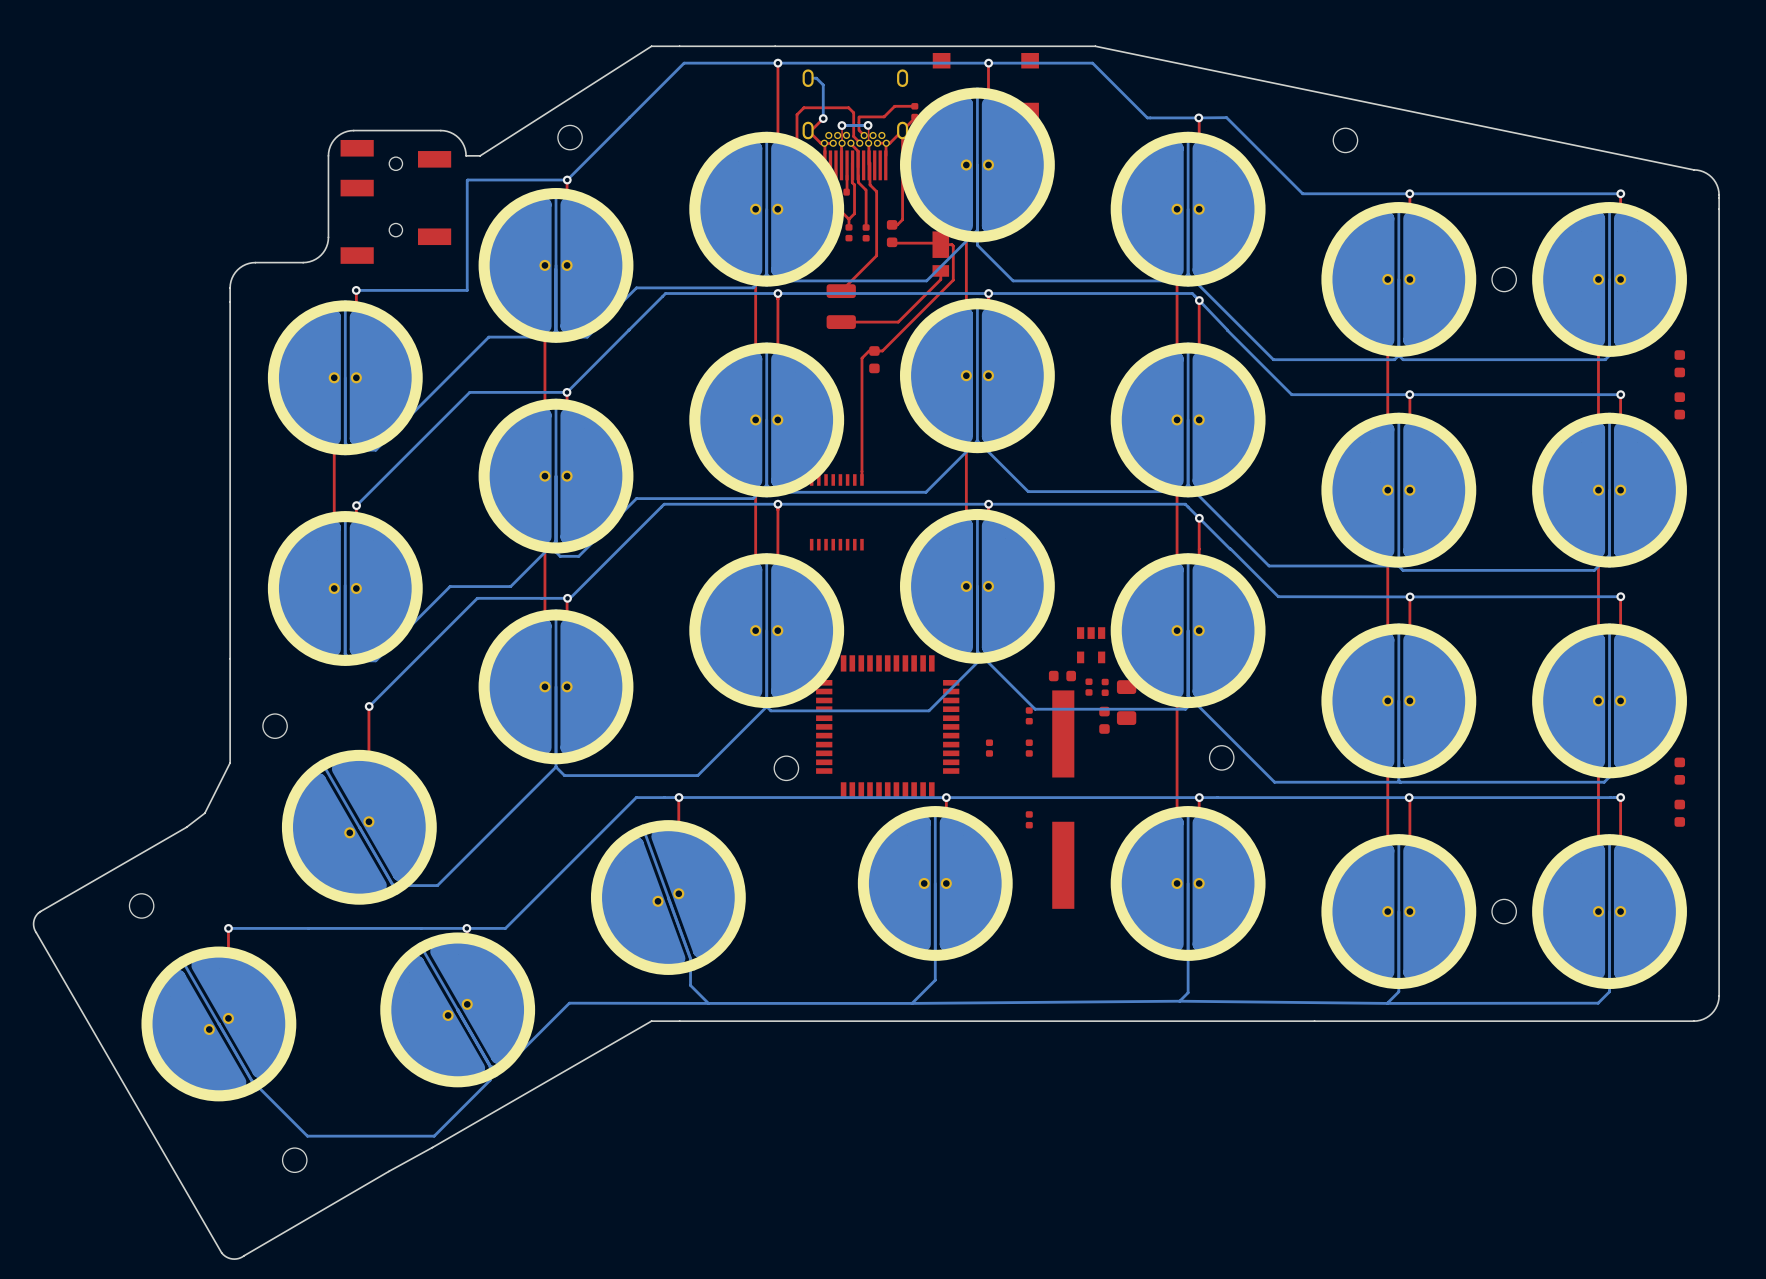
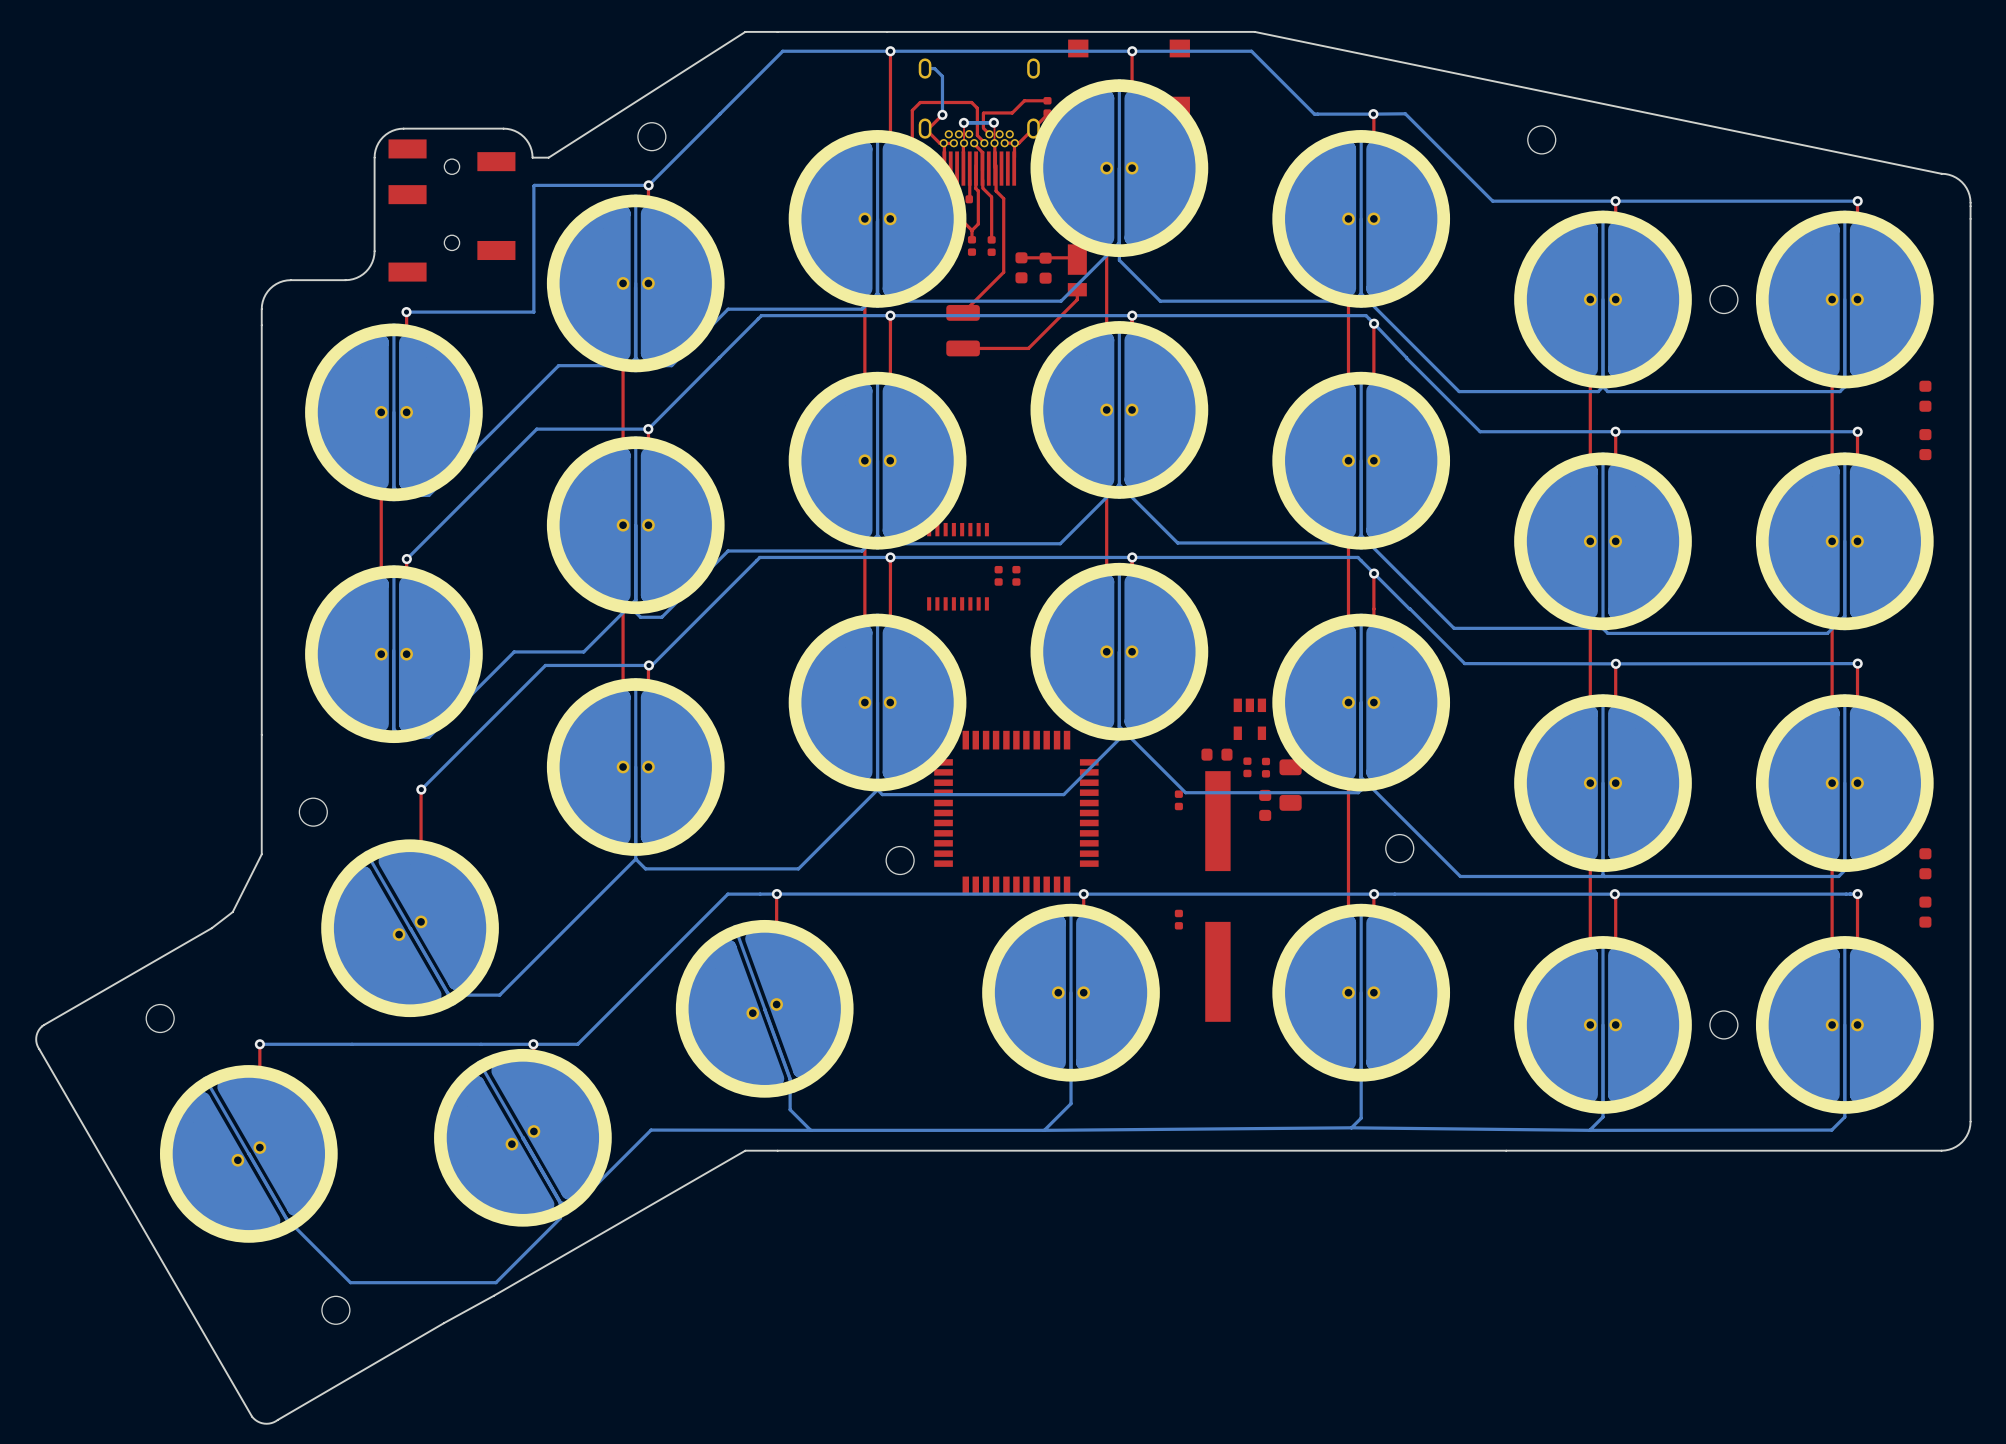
top track: (902, 130) (902, 219) (897, 224) (892, 224) -> none
part: (892, 233) -> none
top track: (940, 244) (953, 246) (953, 280) (882, 350) (869, 350) (861, 358) (861, 479) -> none
part: none -> (1021, 267)
part: none -> (1045, 268)
part: (874, 359) -> none
part: none -> (998, 575)
part: none -> (1016, 575)
part: (989, 748) -> none
part: (1029, 748) -> none

